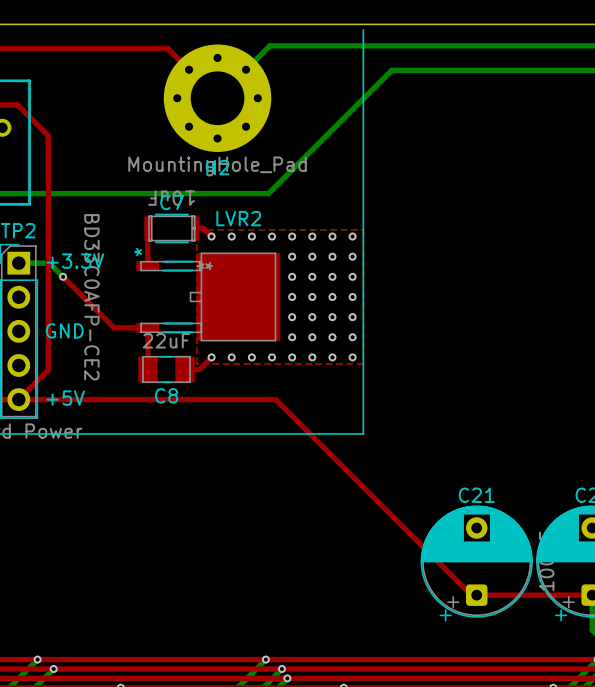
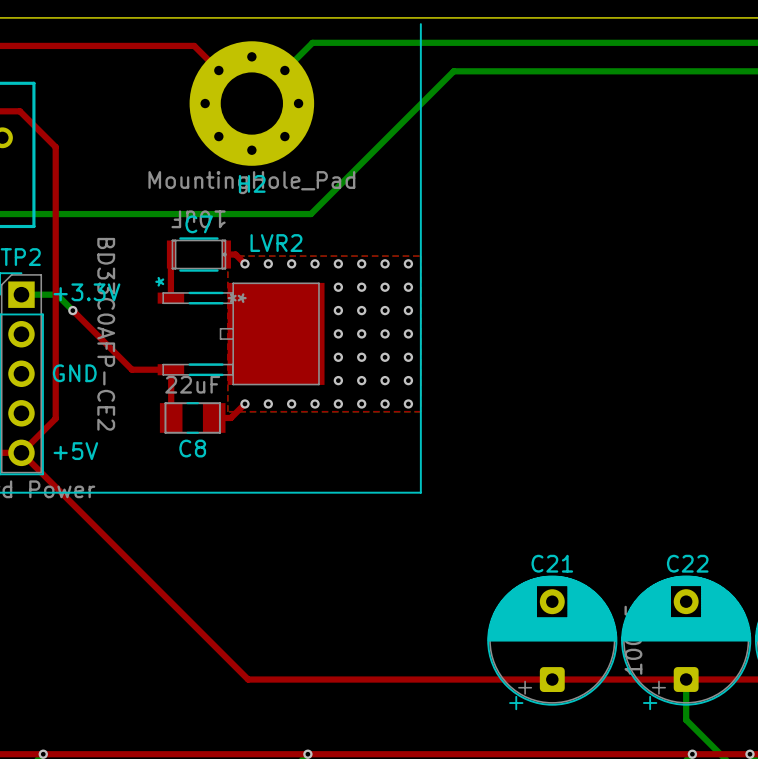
top track: (18, 399) (275, 399) (471, 595) -> (21, 452) (248, 679) (546, 679)

